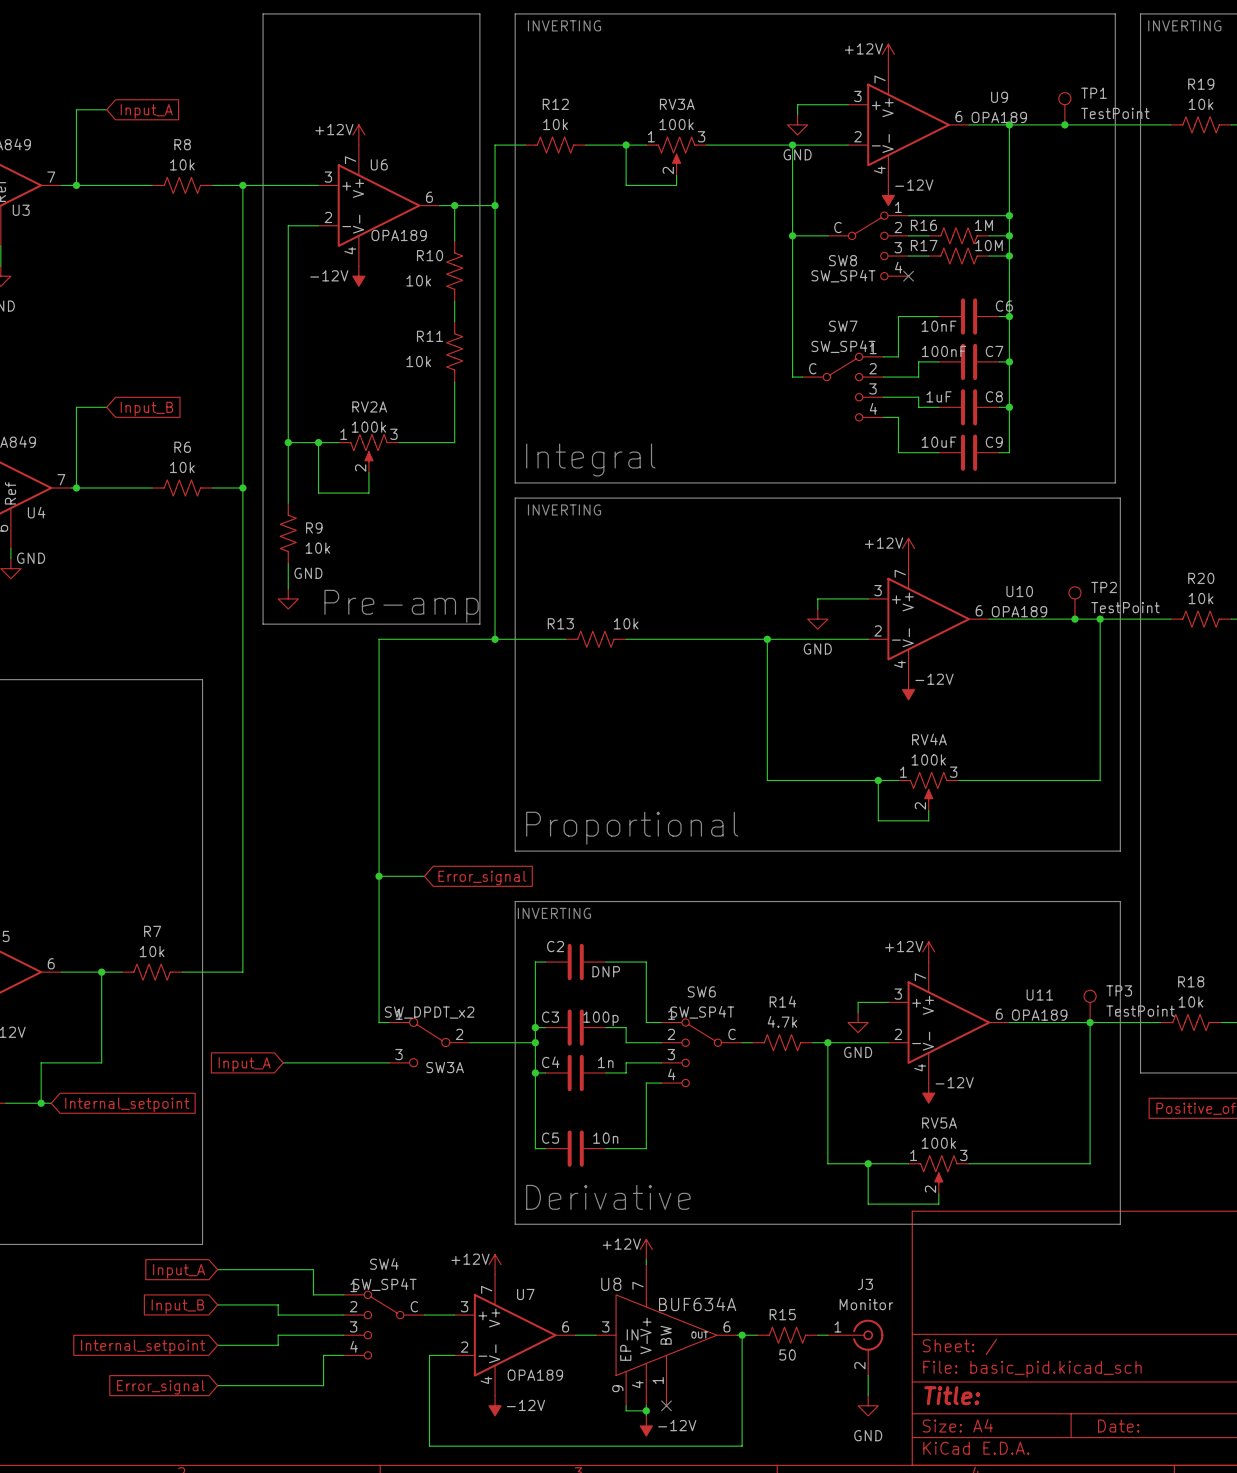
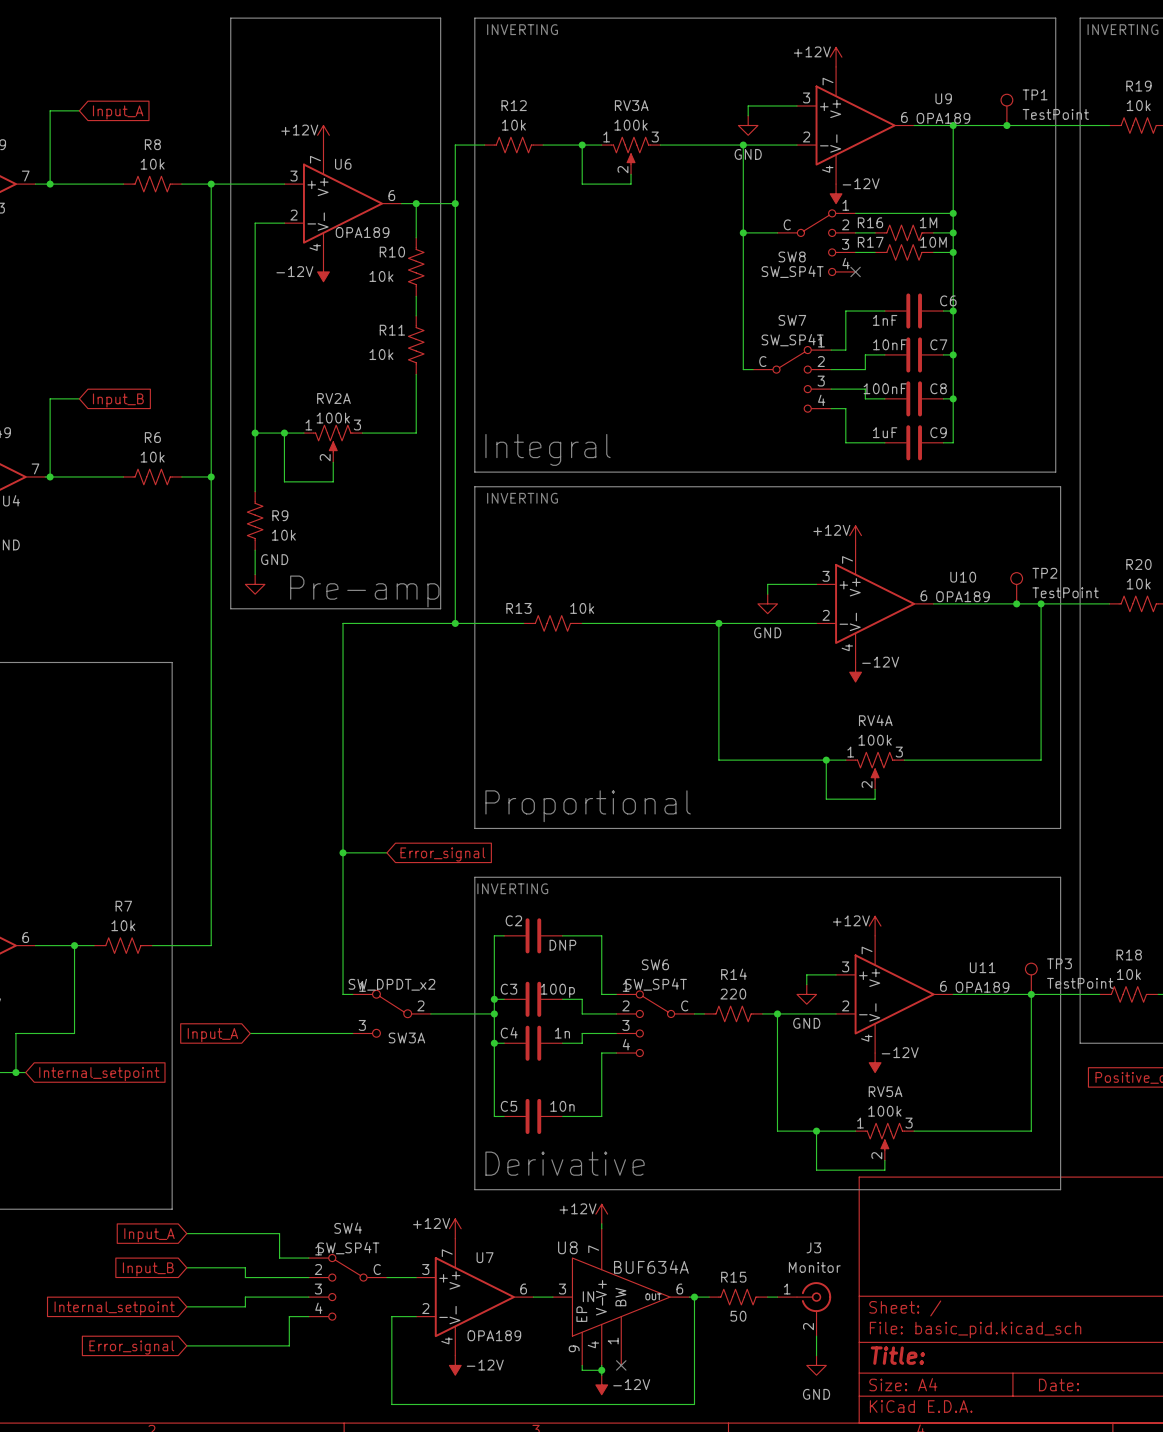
C6 value: 10nF (939, 326) -> 1nF (885, 320)
C7 value: 100nF (944, 351) -> 10nF (889, 344)
C8 value: 1uF (939, 396) -> 100nF (885, 388)
C9 value: 10uF (939, 442) -> 1uF (885, 432)
R14 value: 4.7k (782, 1021) -> 220 (733, 994)

